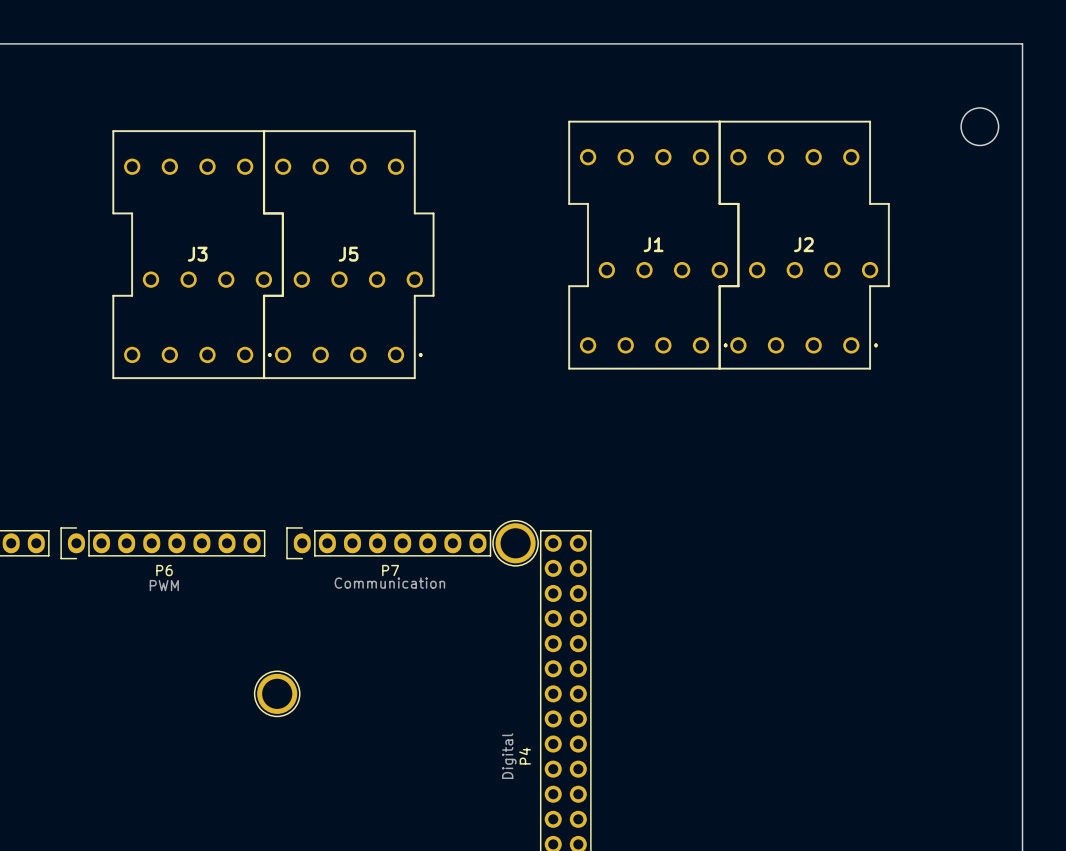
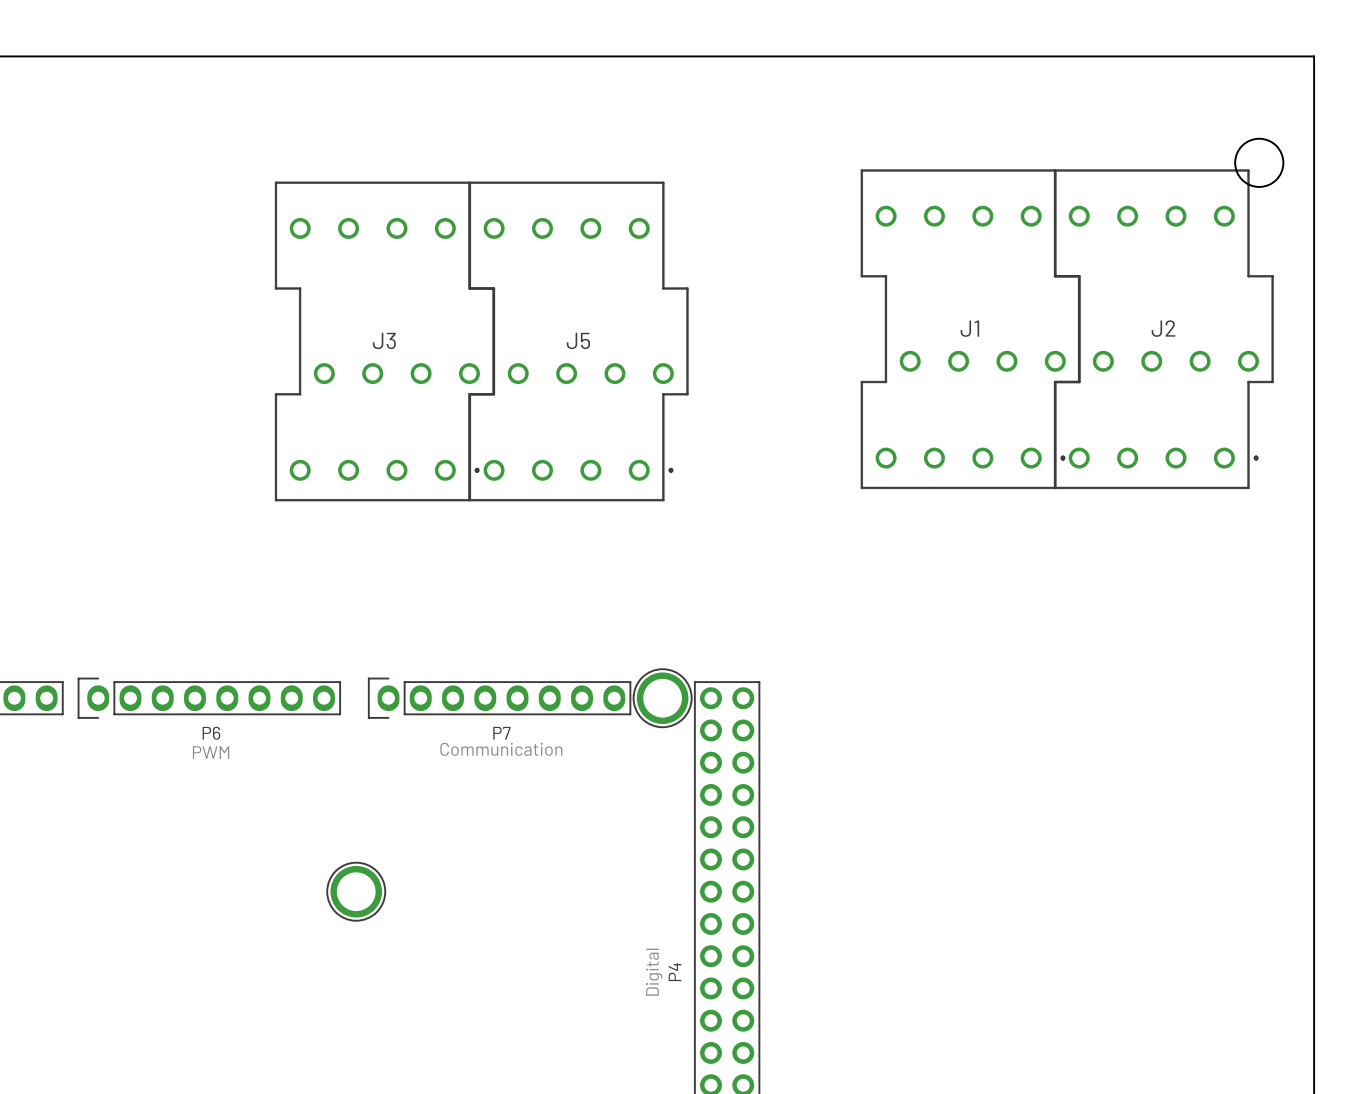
J1 position: (653, 245) -> (970, 329)
J2 position: (804, 245) -> (1163, 329)
J3 position: (198, 254) -> (384, 341)
J5 position: (348, 254) -> (578, 341)

